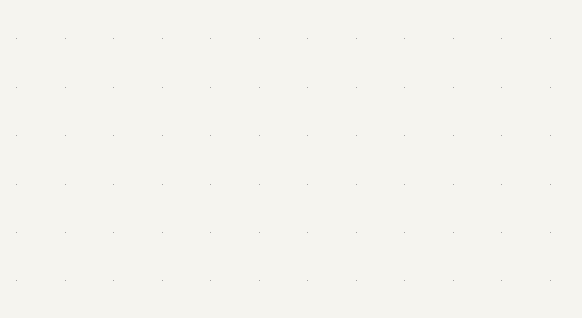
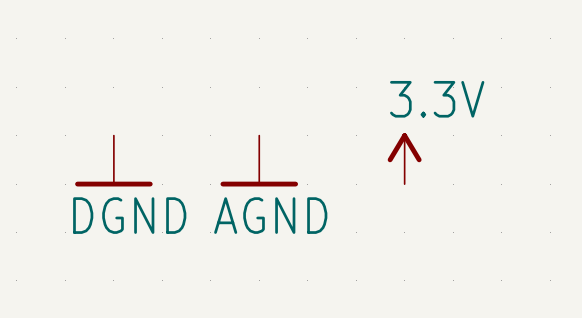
power symbol: none -> 3.3V (404, 158)
power symbol: none -> DGND (113, 161)
power symbol: none -> AGND (259, 161)

